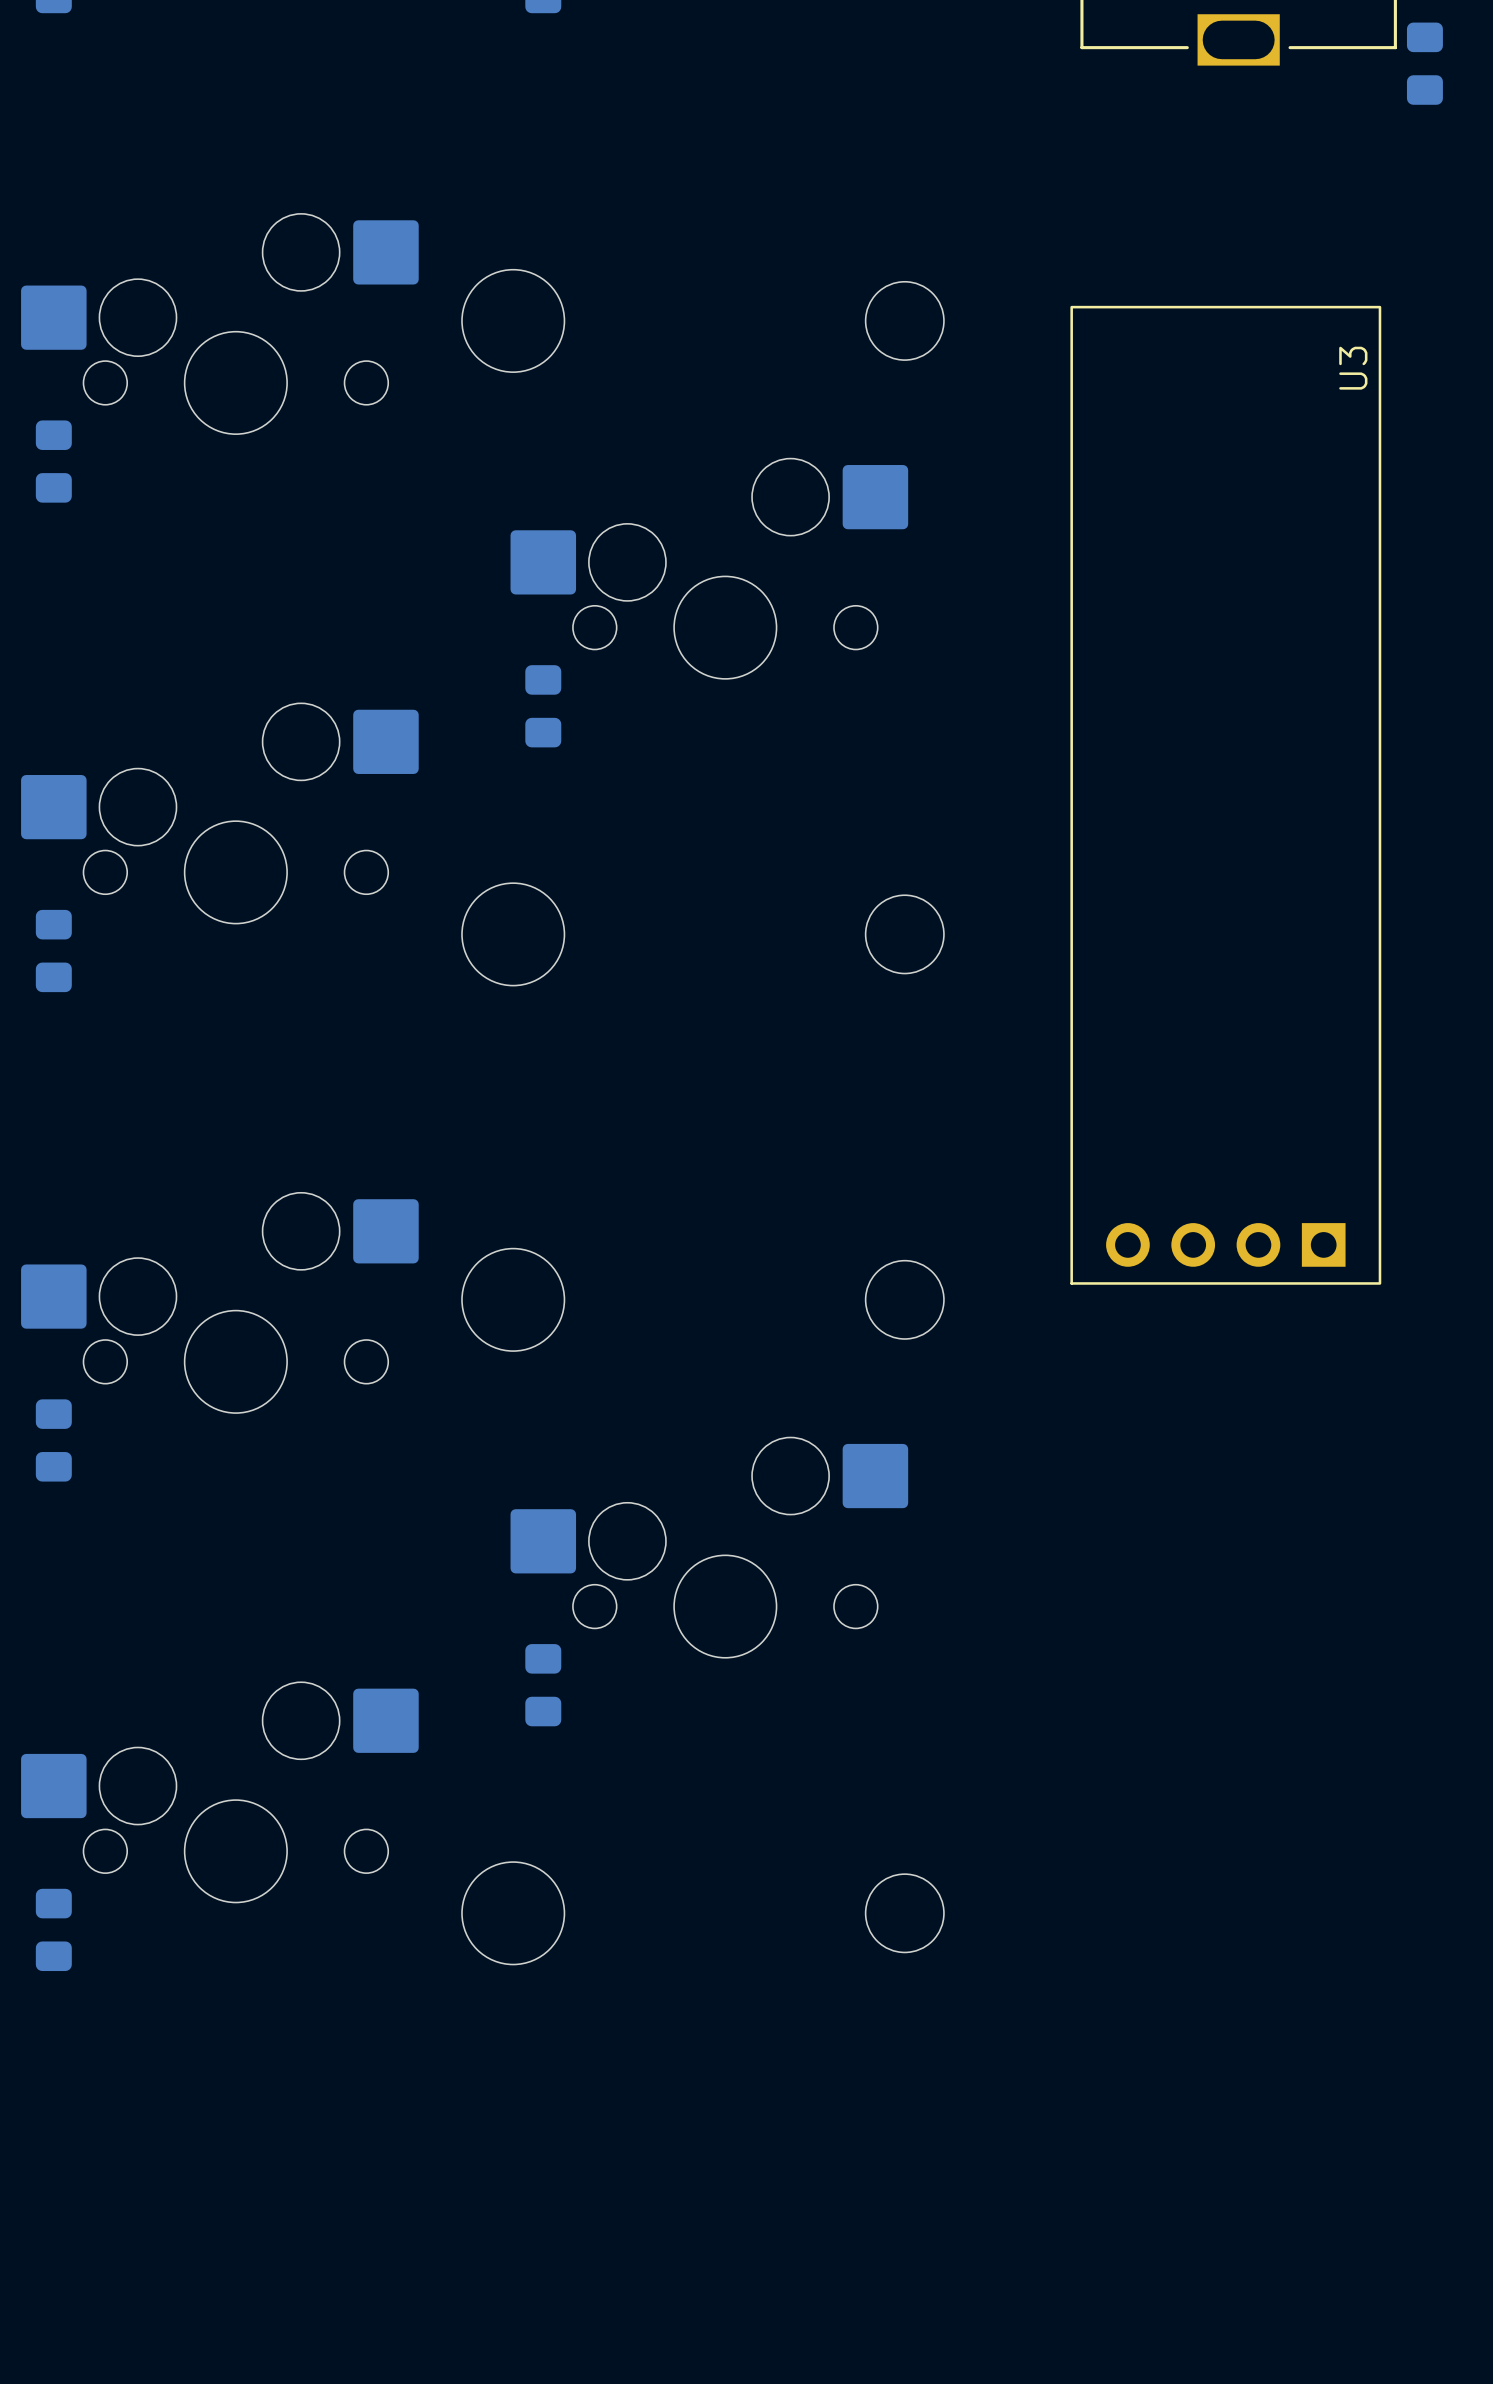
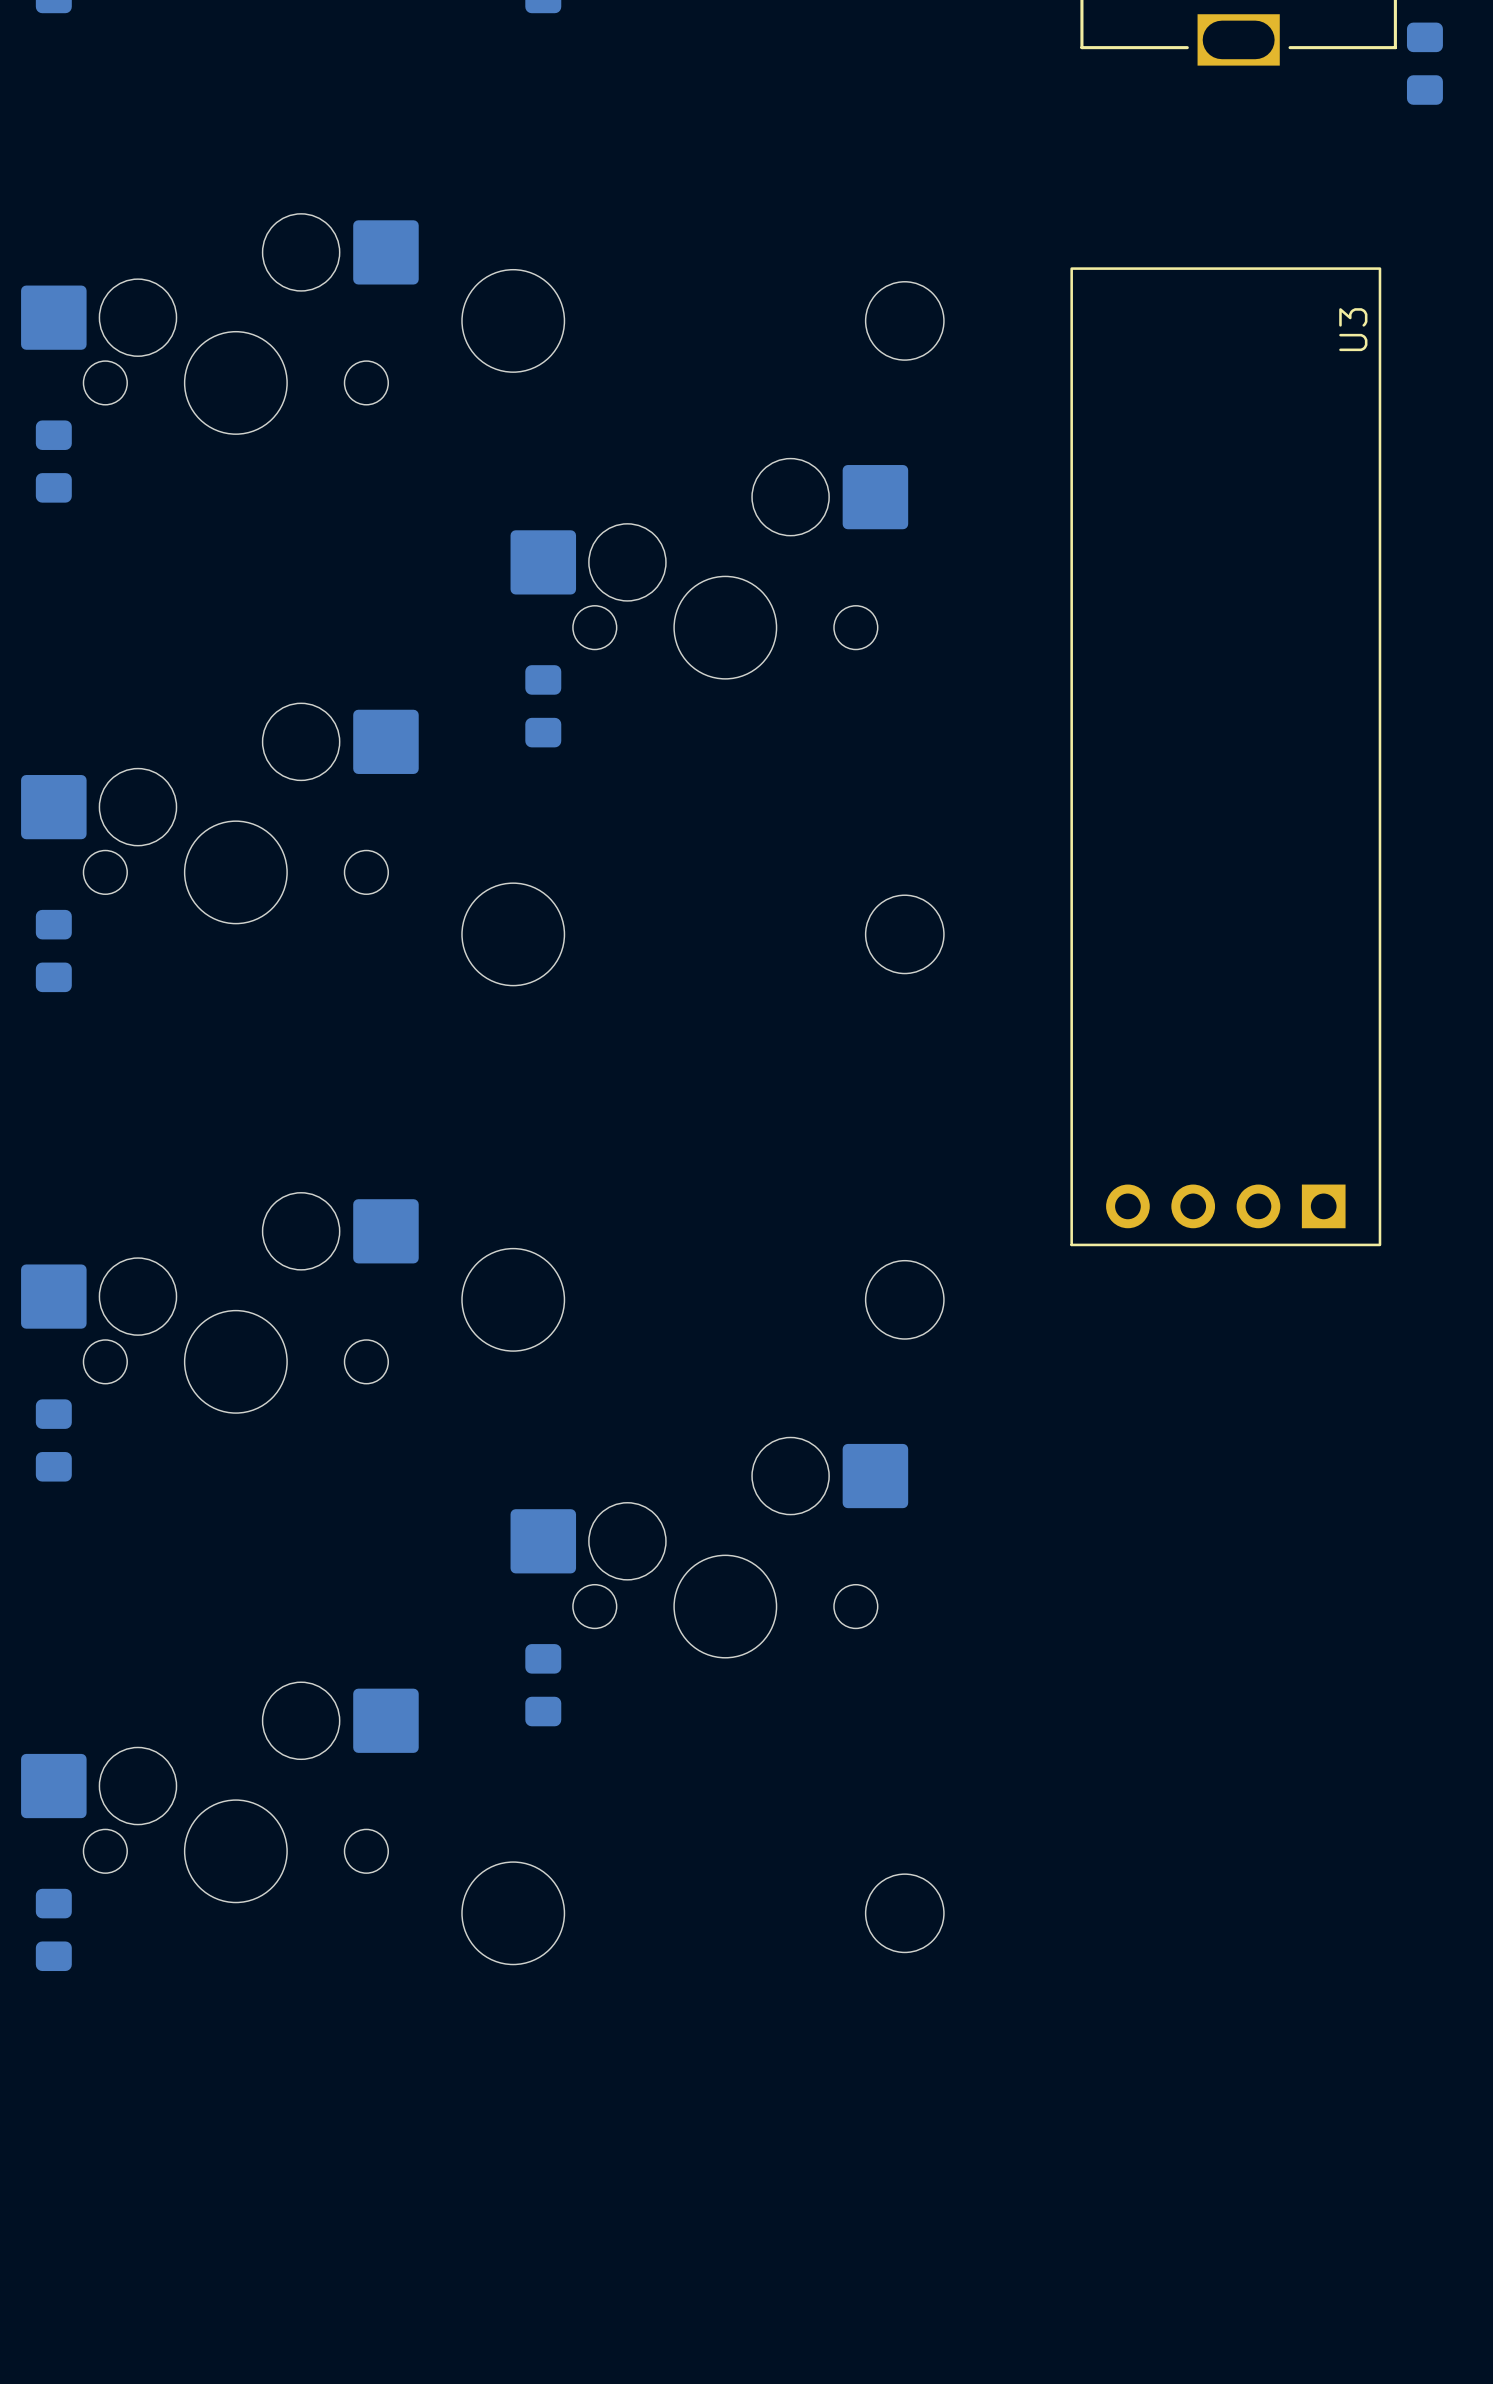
U3 position: (1225, 795) -> (1225, 756)

